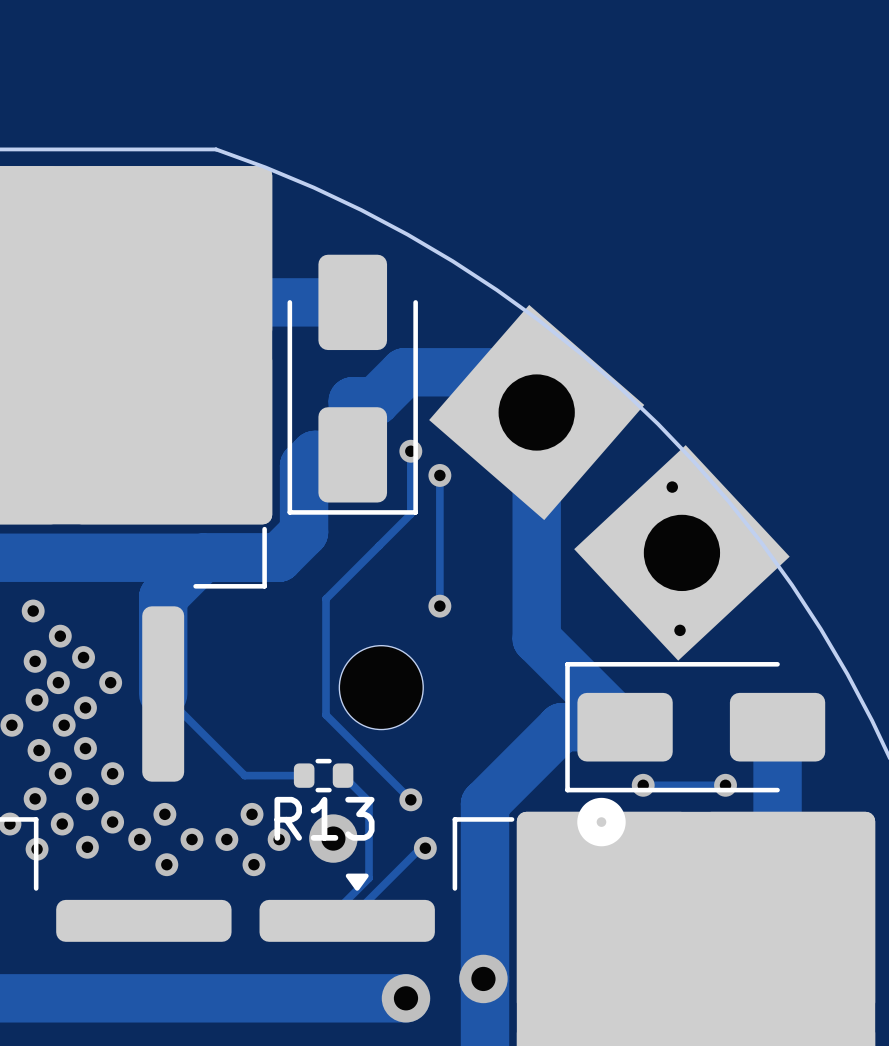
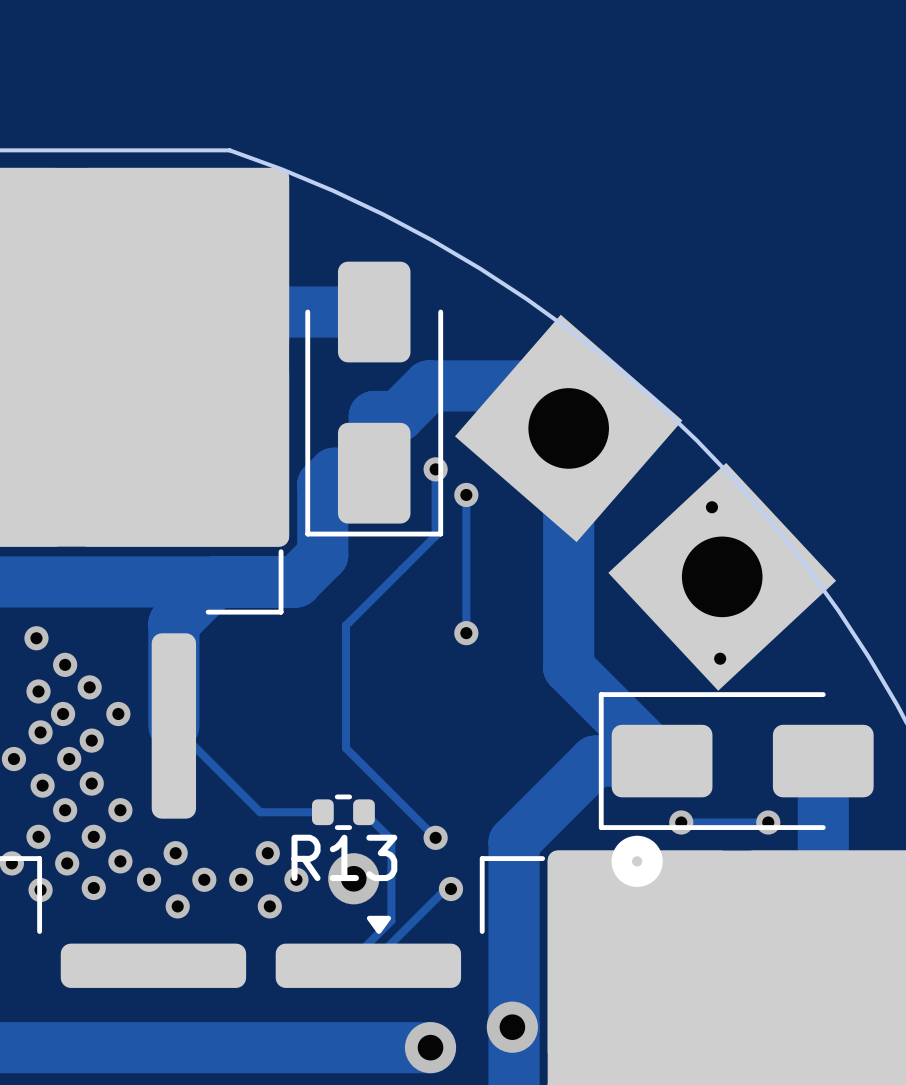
part: (381, 687) -> none

